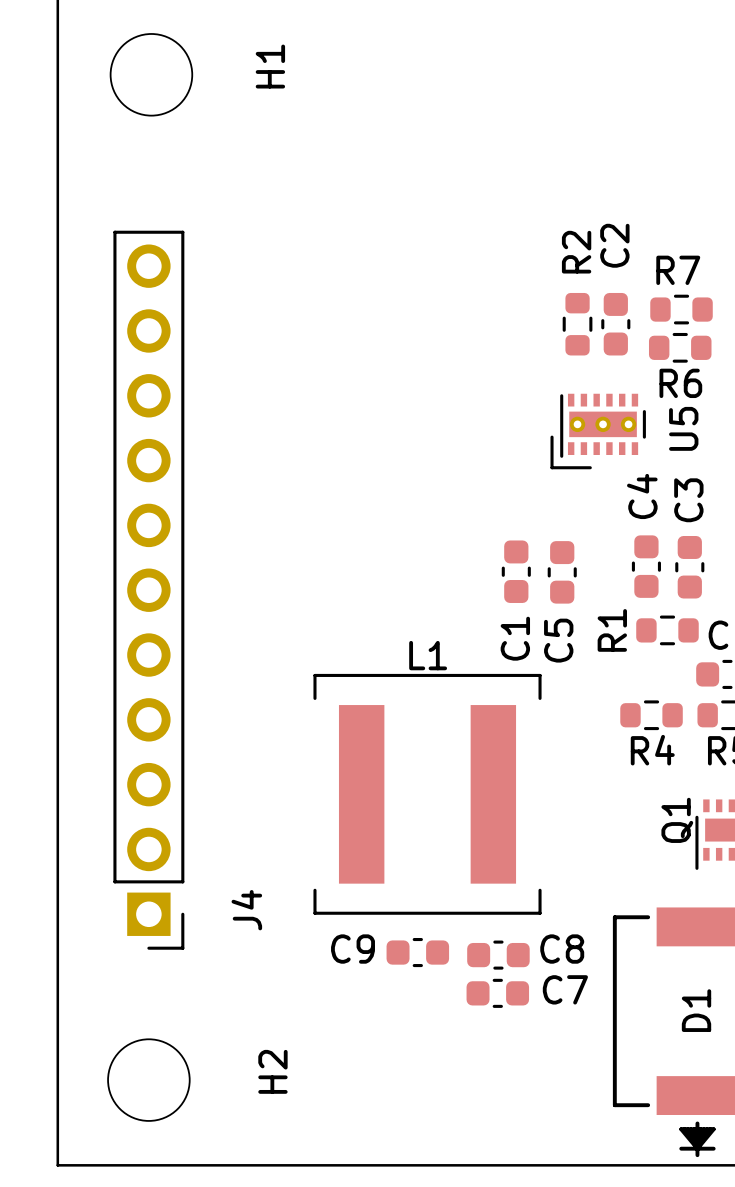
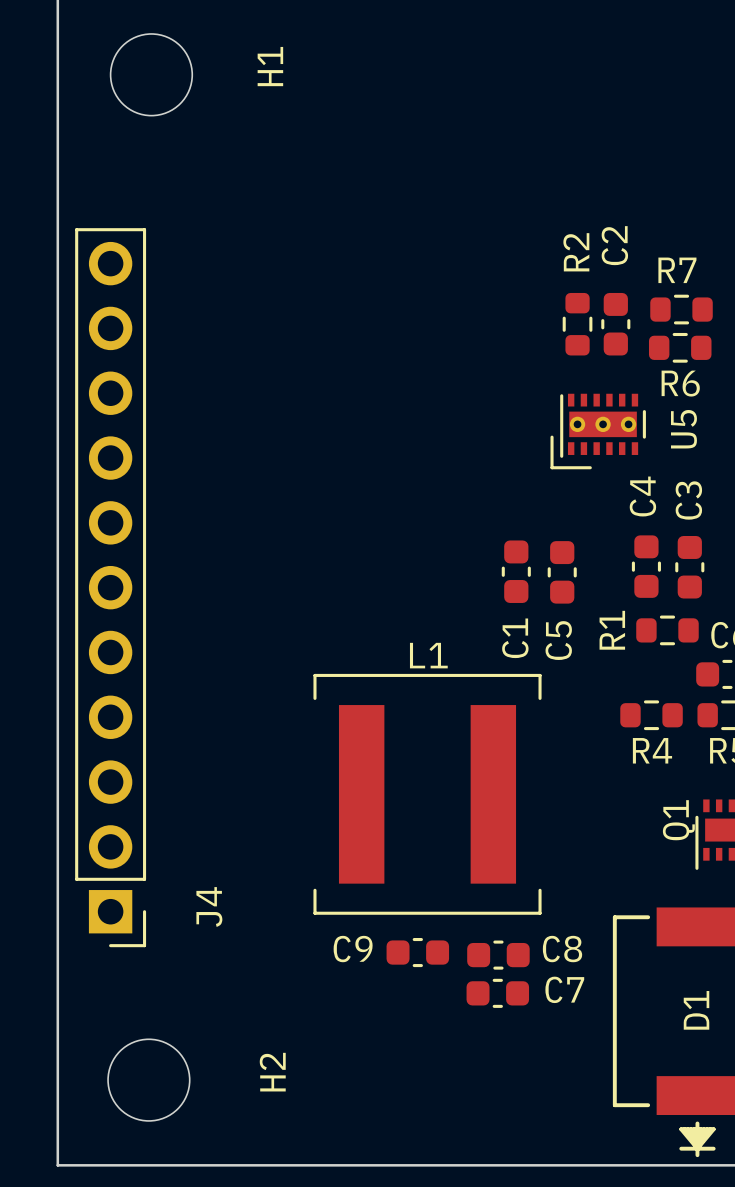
J4 position: (148, 590) -> (110, 587)

